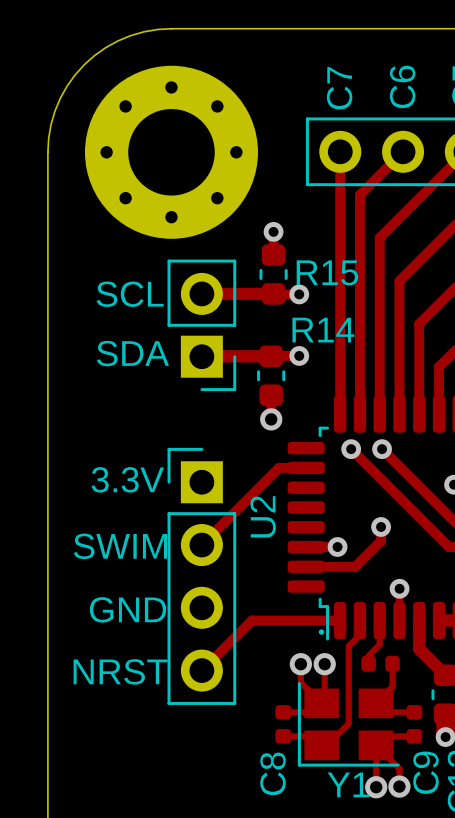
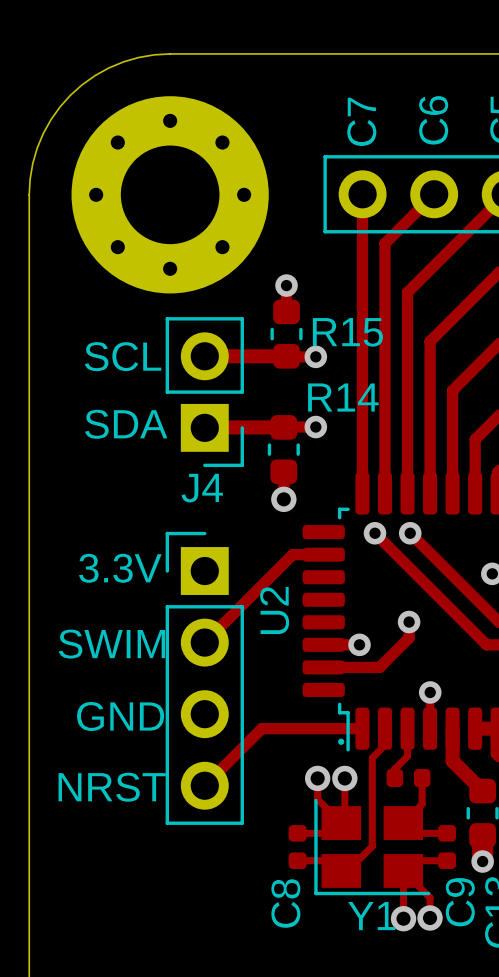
J4 name: none -> J4 (202, 488)

